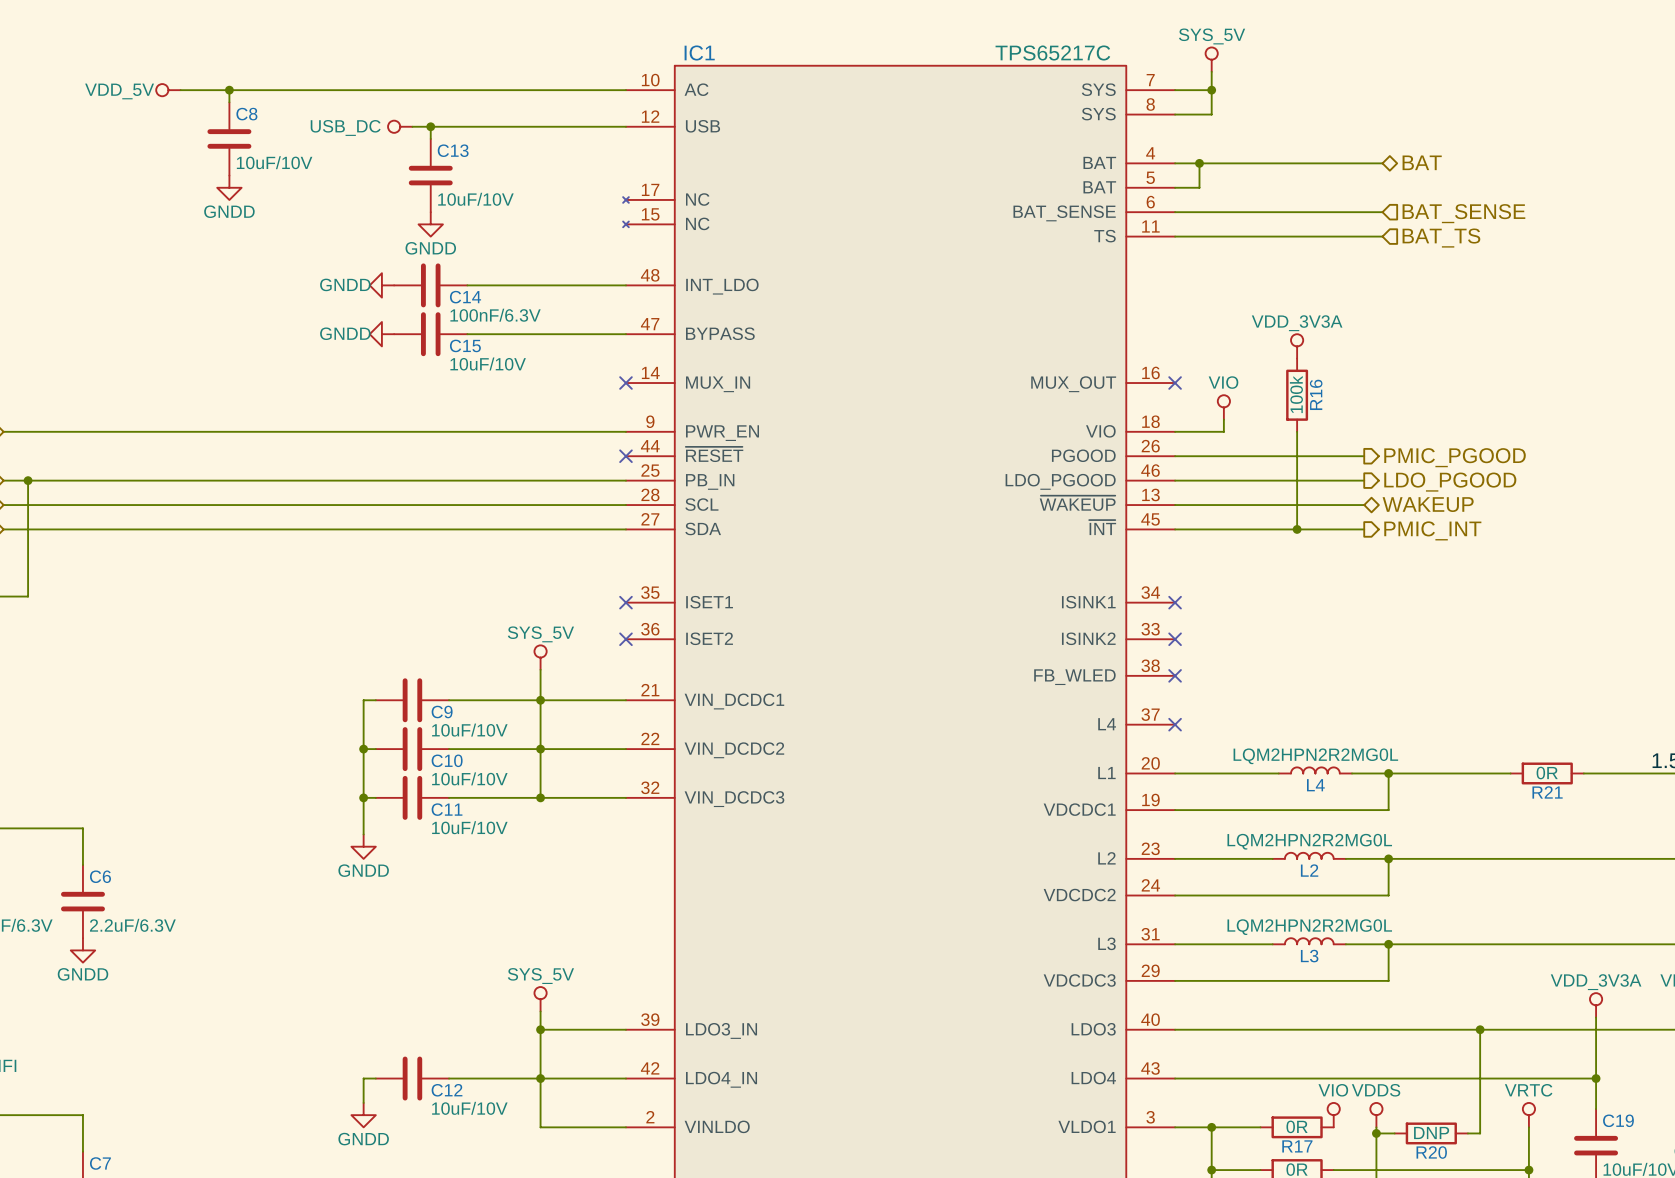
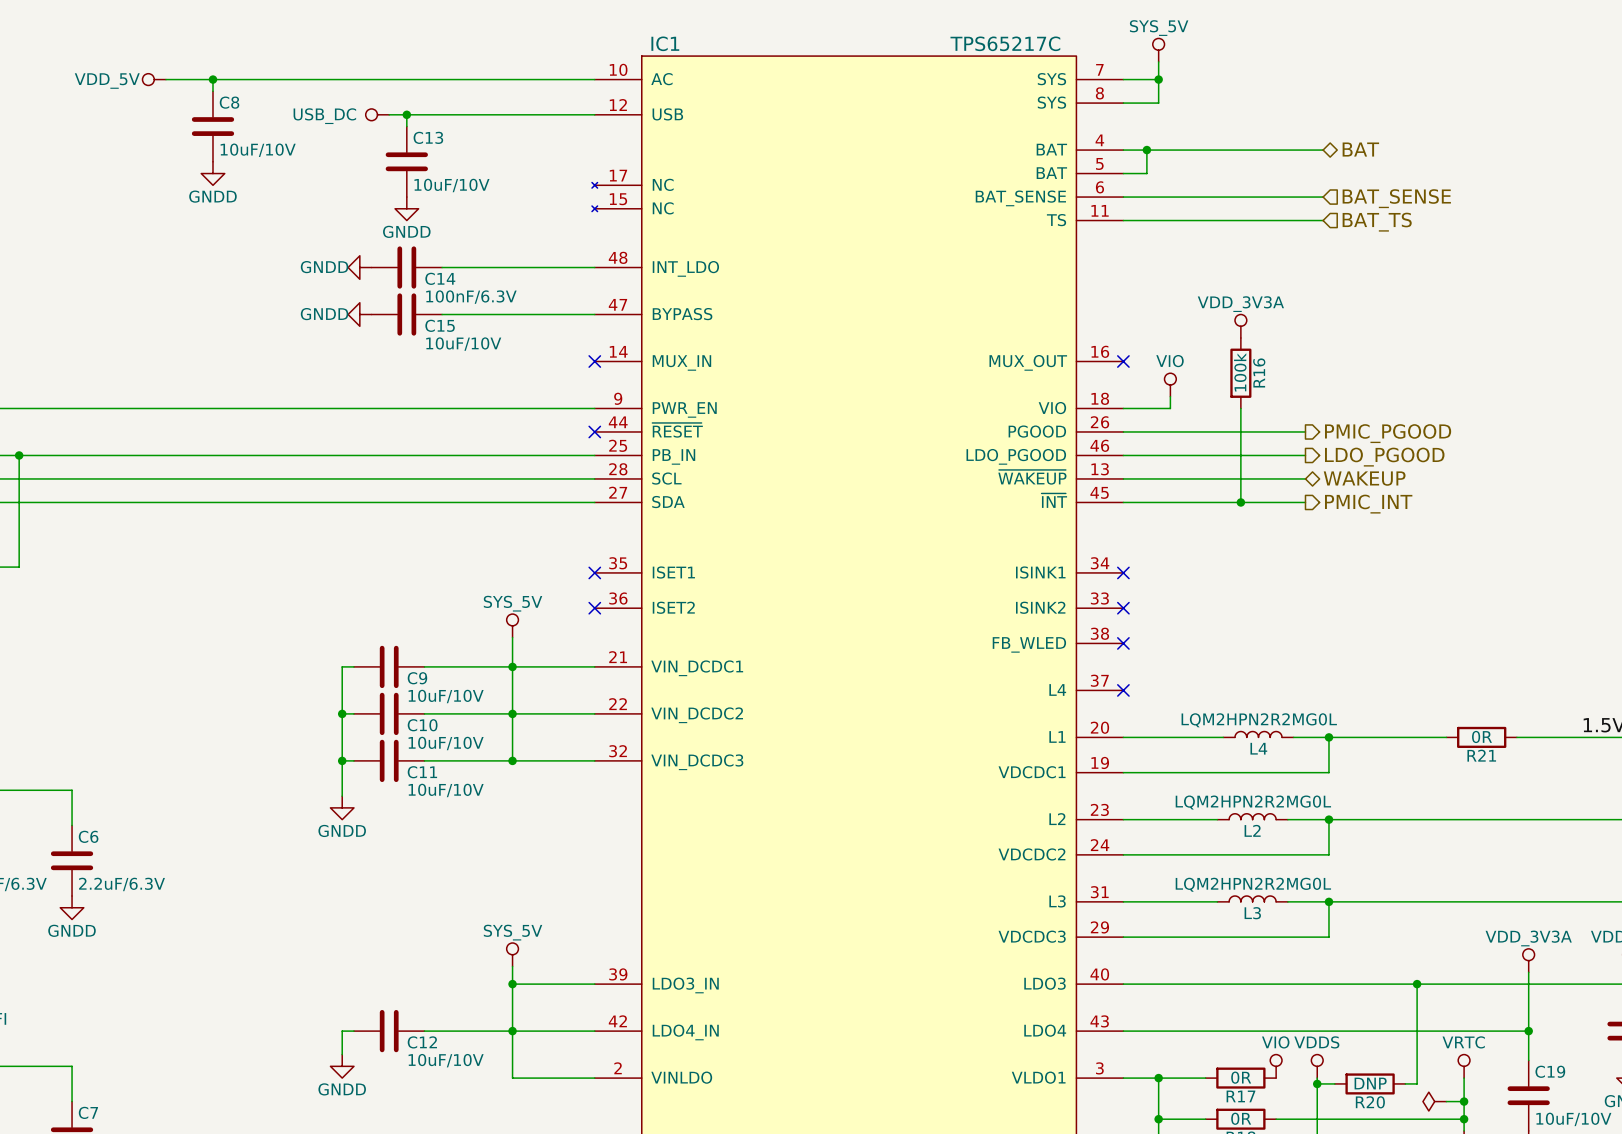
power symbol: none -> (1434, 1101)
wire: none -> (1446, 1101) (1464, 1101)
junction: none -> (1464, 1101)

